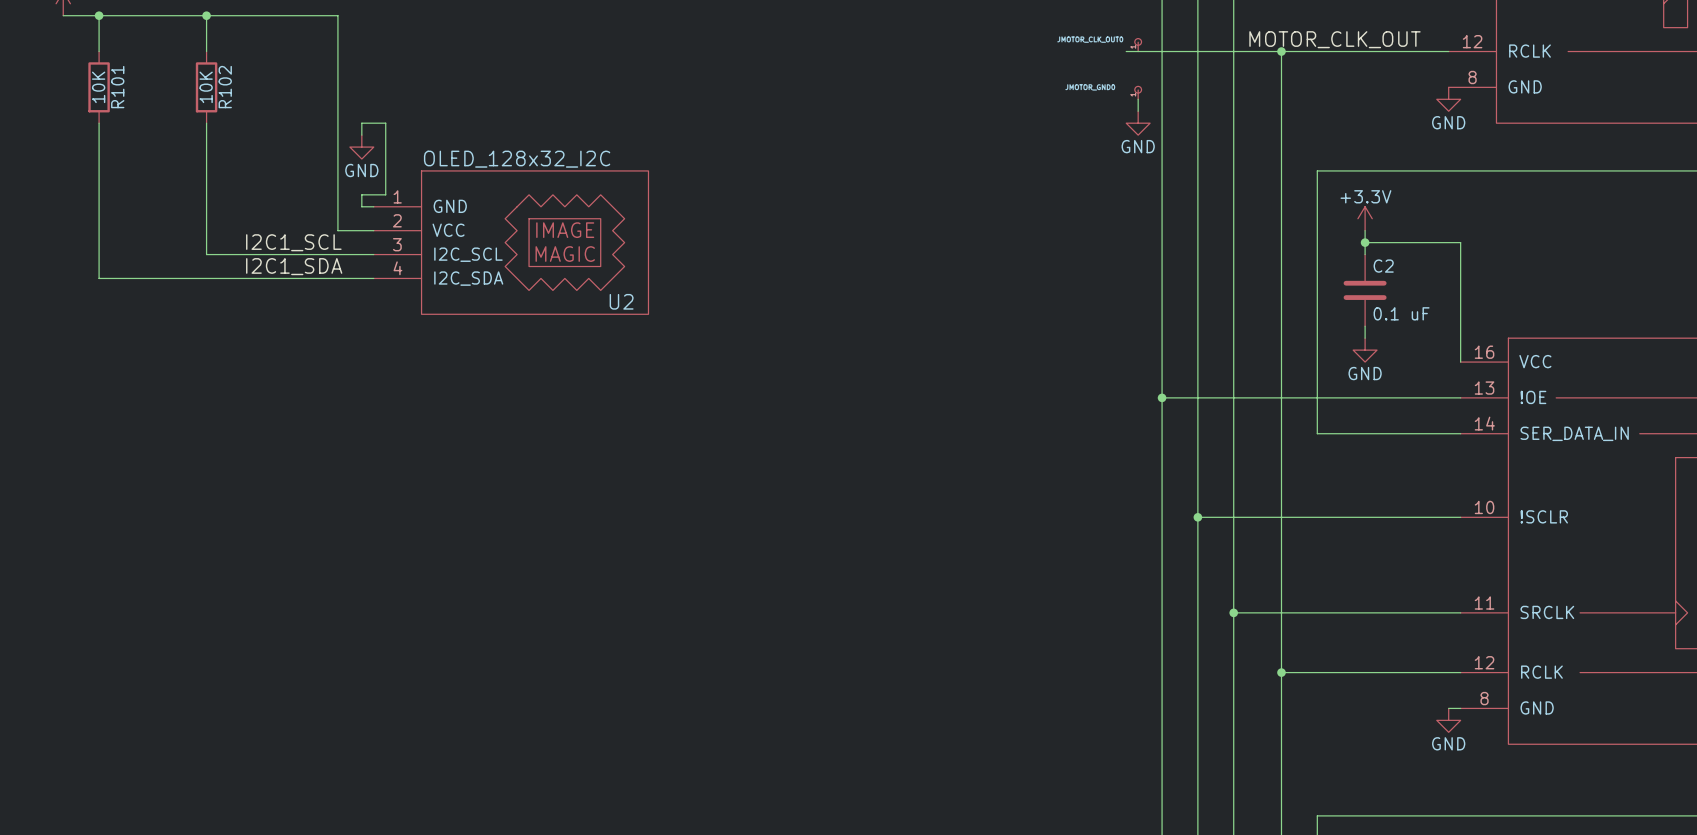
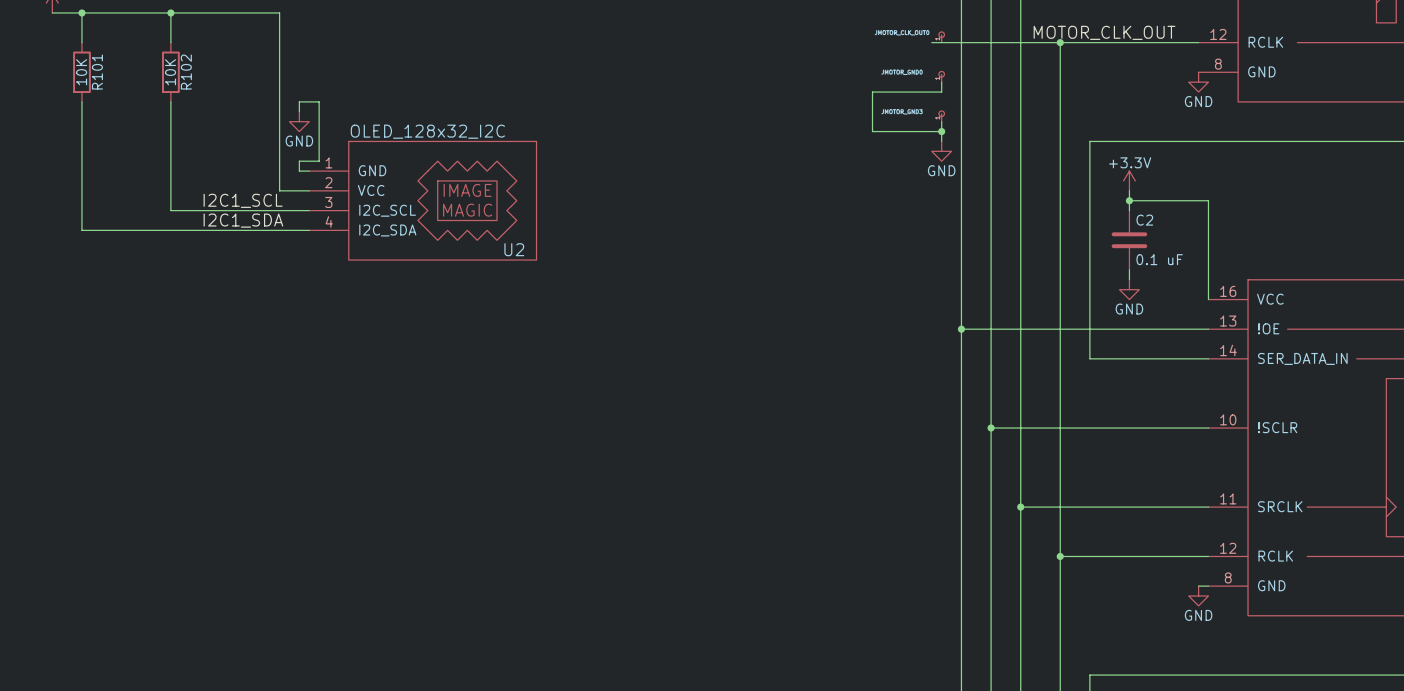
wire: none -> (941, 92) (872, 92) (872, 131) (941, 131)
power symbol position: GND (1138, 123) -> GND (941, 151)
part: none -> (941, 116)
wire: none -> (941, 121) (941, 141)
junction: none -> (941, 131)

